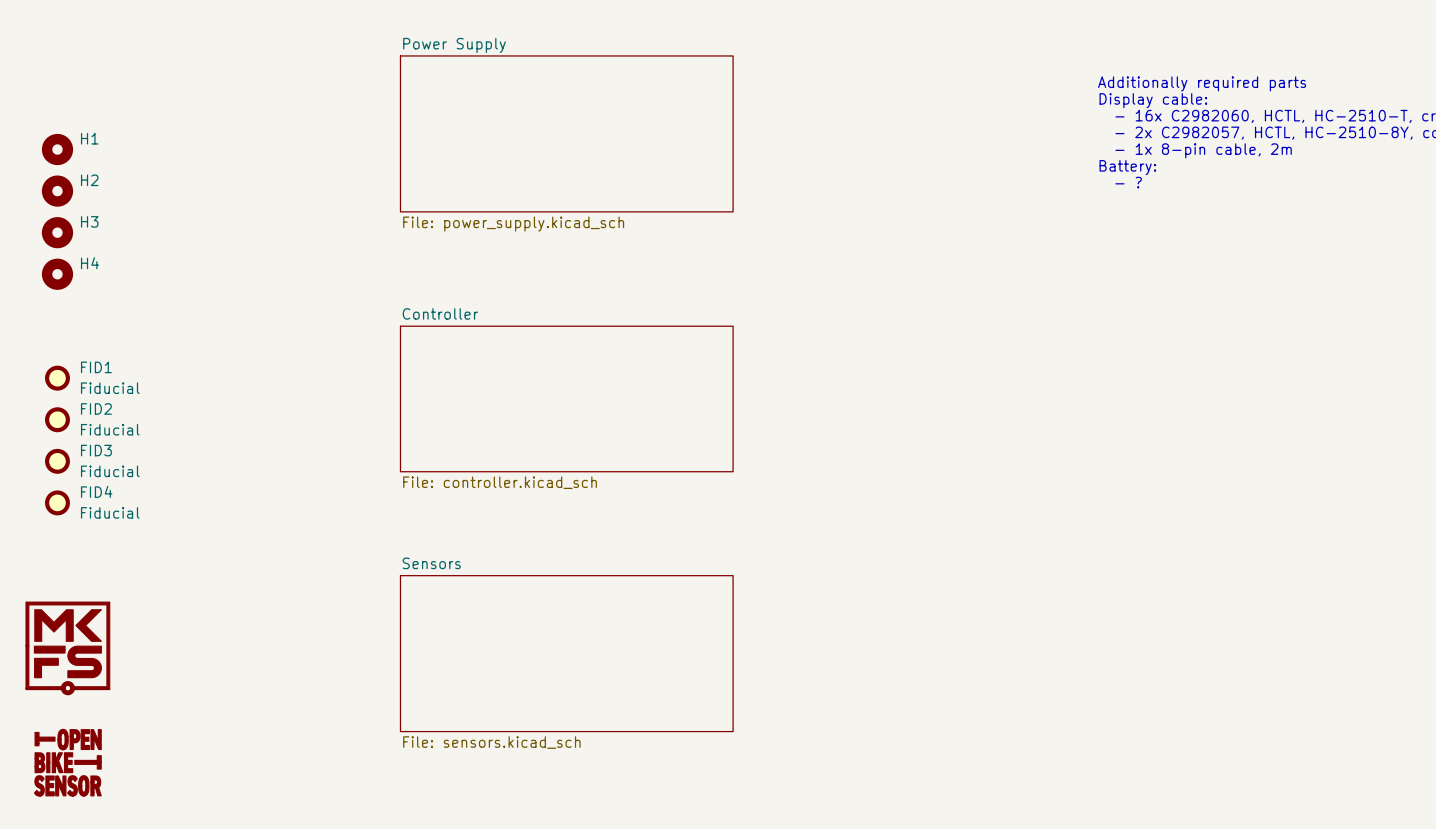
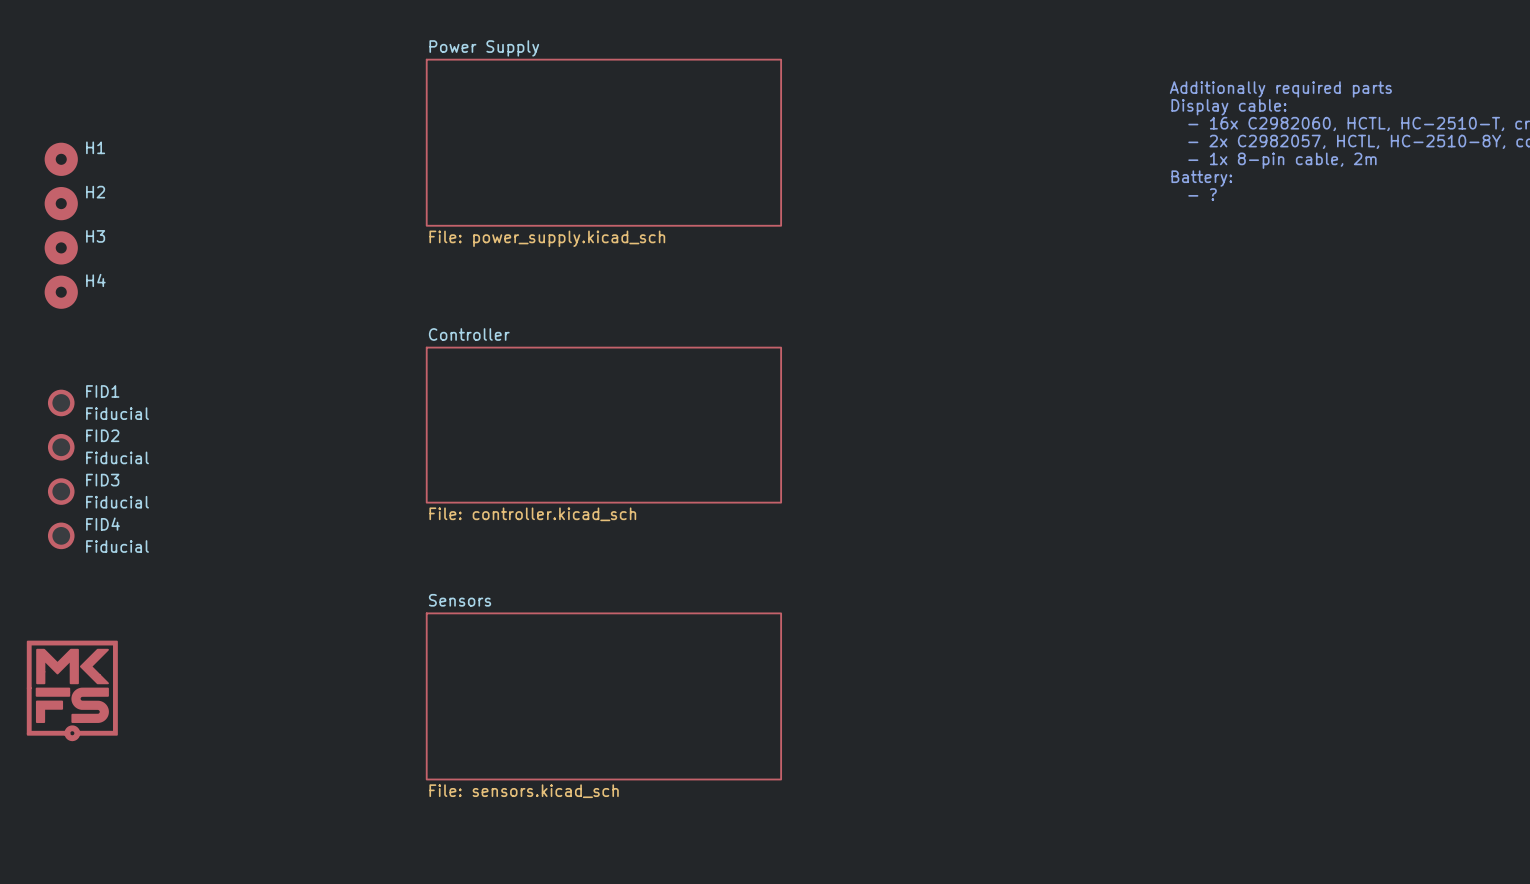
part: (67, 762) -> none

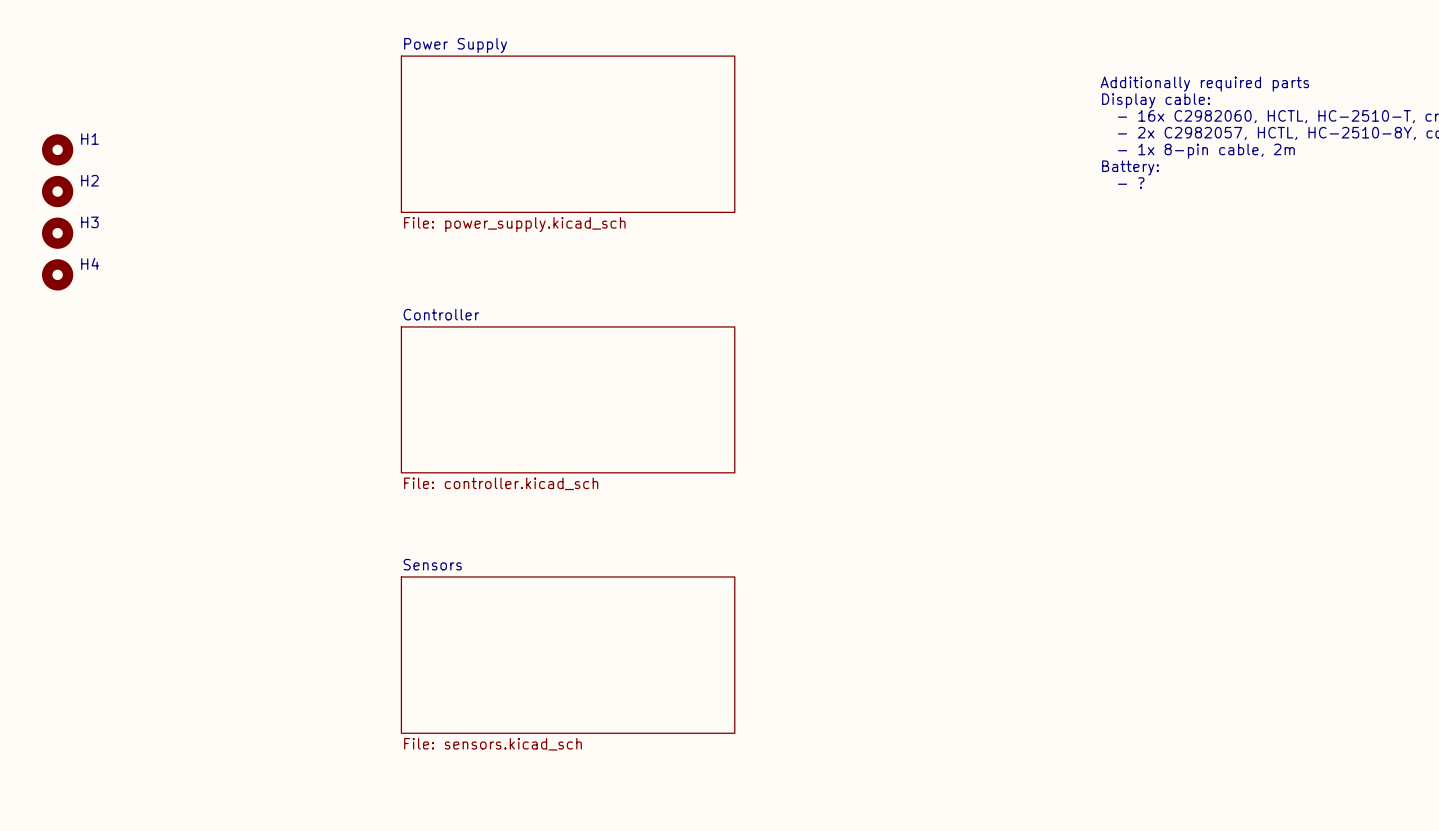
FID1: Fiducial (61, 402) -> none
FID2: Fiducial (61, 447) -> none
FID3: Fiducial (61, 491) -> none
FID4: Fiducial (61, 535) -> none
part: (72, 690) -> none

